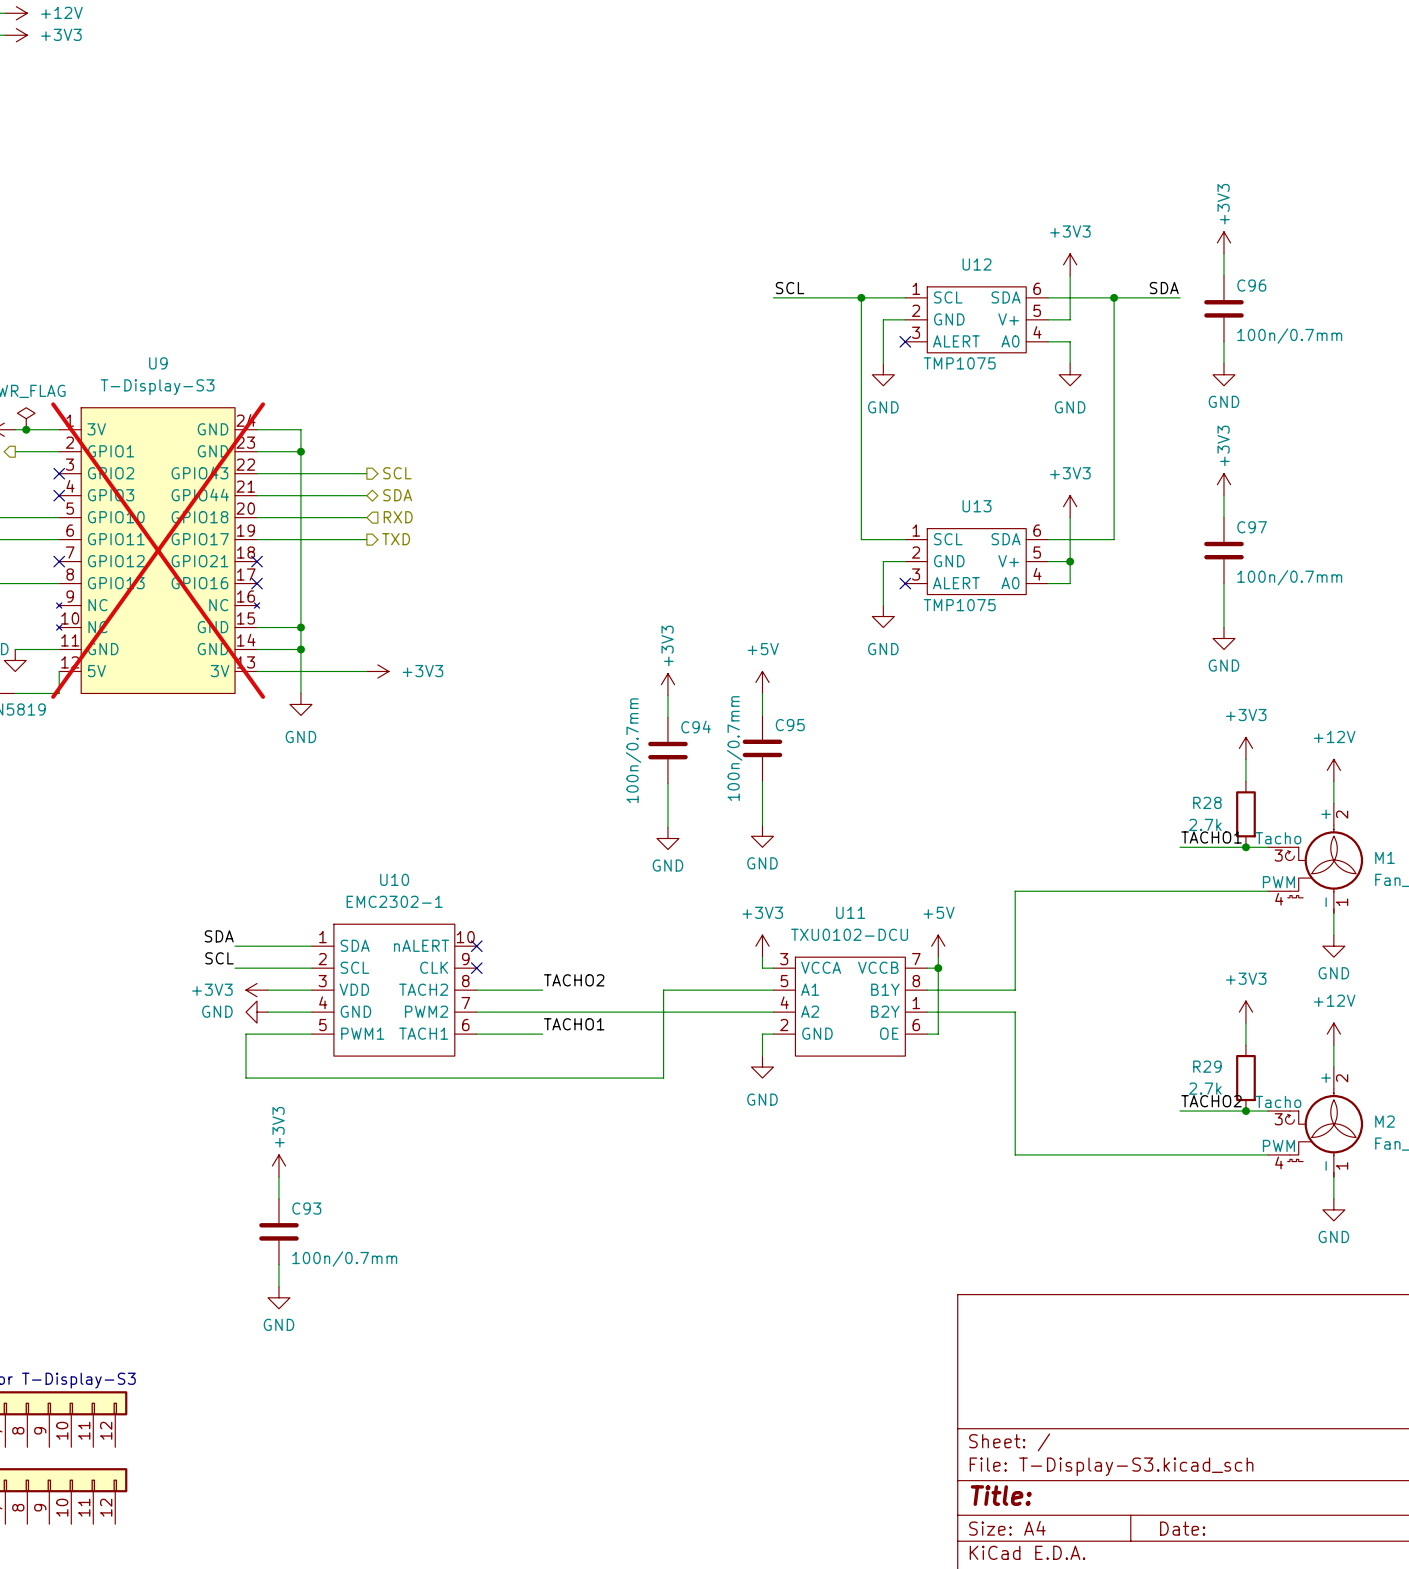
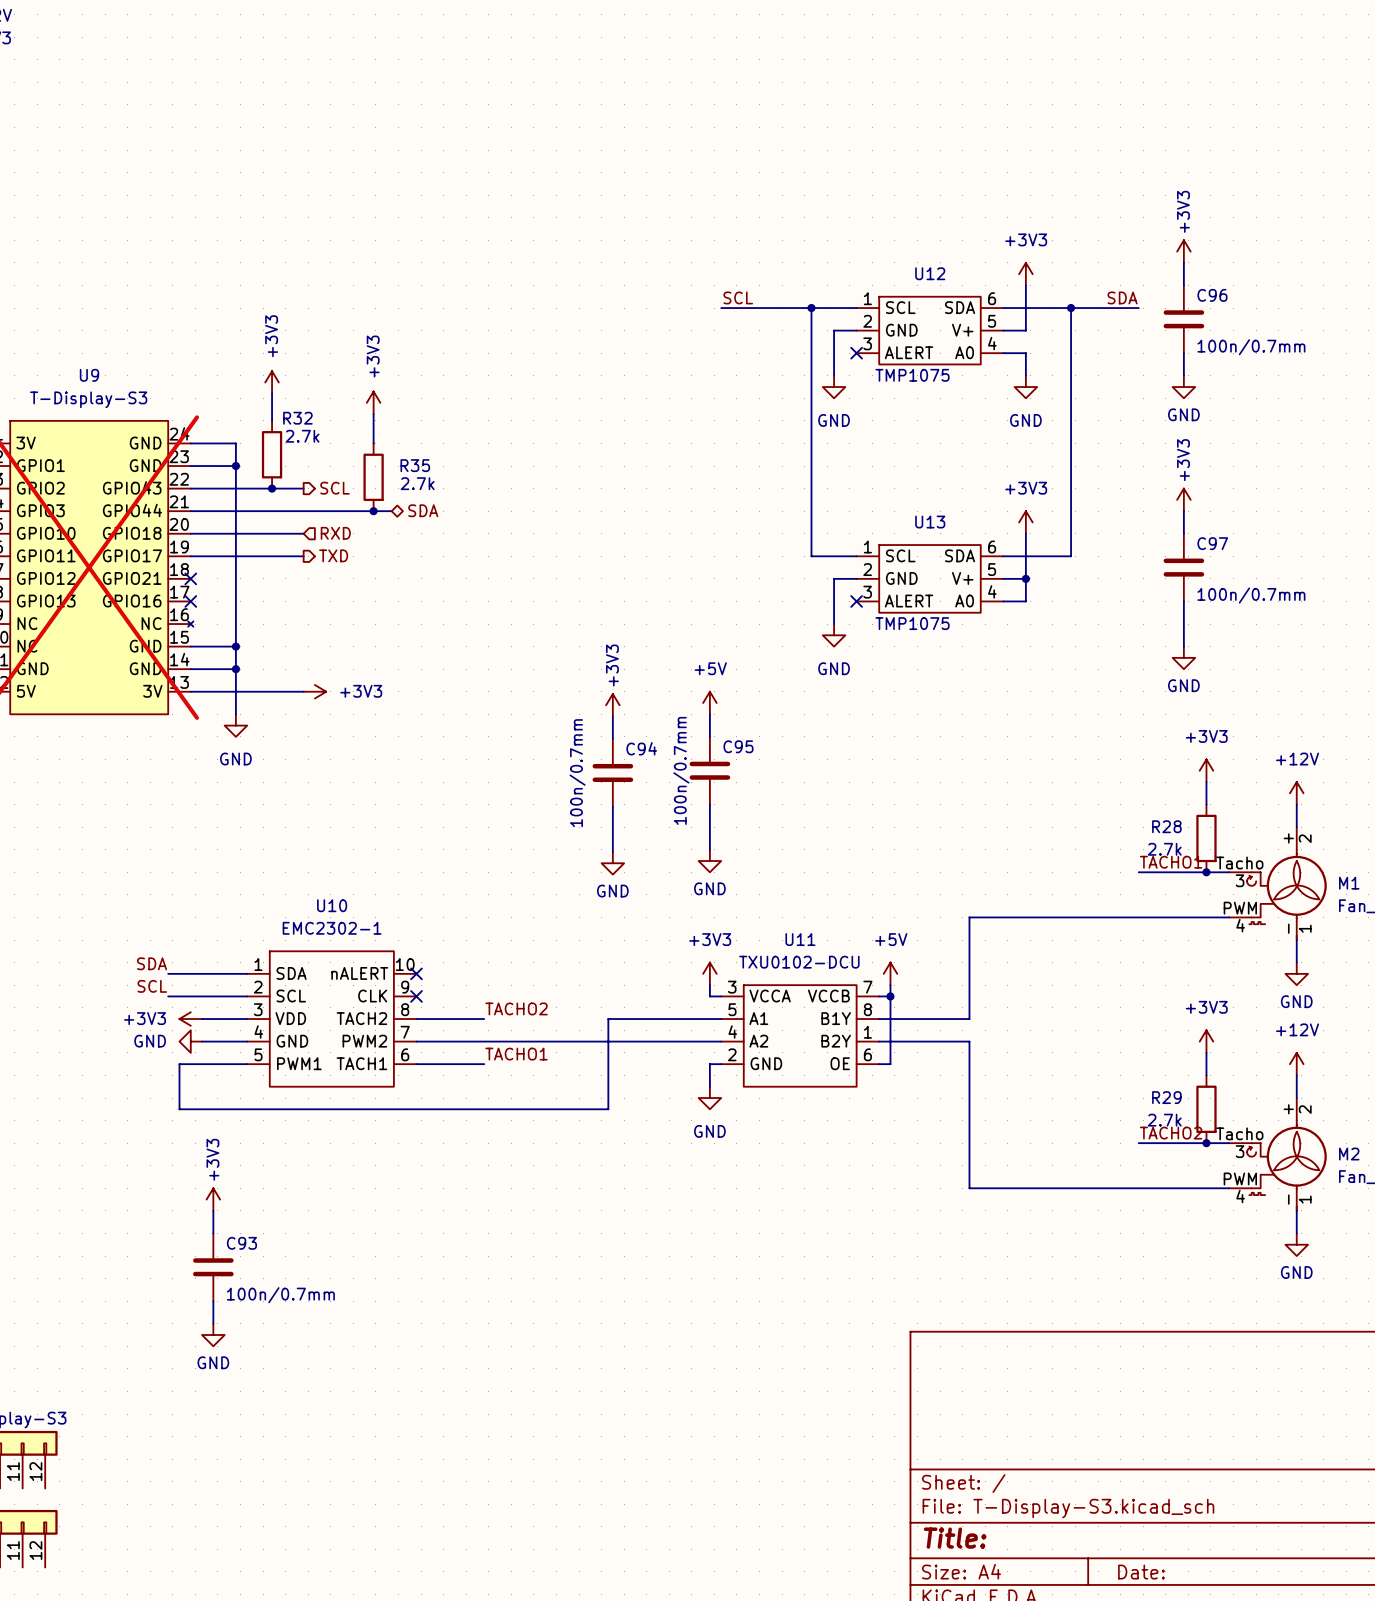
power symbol: none -> +3V3 (272, 382)
wire: none -> (272, 393) (272, 420)
power symbol: none -> +3V3 (373, 402)
wire: none -> (373, 414) (373, 443)
R32: none -> 2.7k (272, 454)
R35: none -> 2.7k (373, 477)
junction: none -> (272, 488)
wire: none -> (303, 511) (391, 511)
hierarchical label position: SDA (397, 495) -> SDA (423, 510)
junction: none -> (373, 511)

